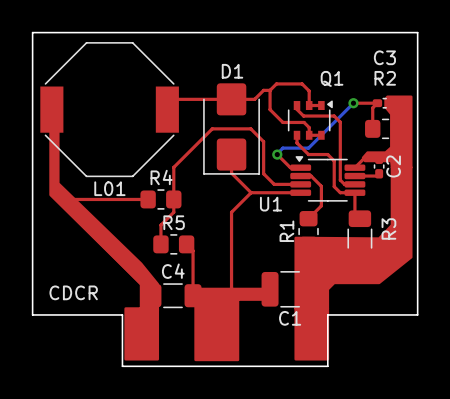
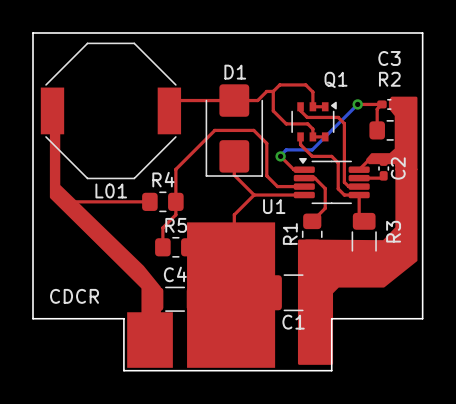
drawing: none -> [187, 222, 276, 368]
drawing: [194, 288, 240, 362] -> none
drawing shape: [124, 307, 160, 361] -> [127, 312, 173, 368]

